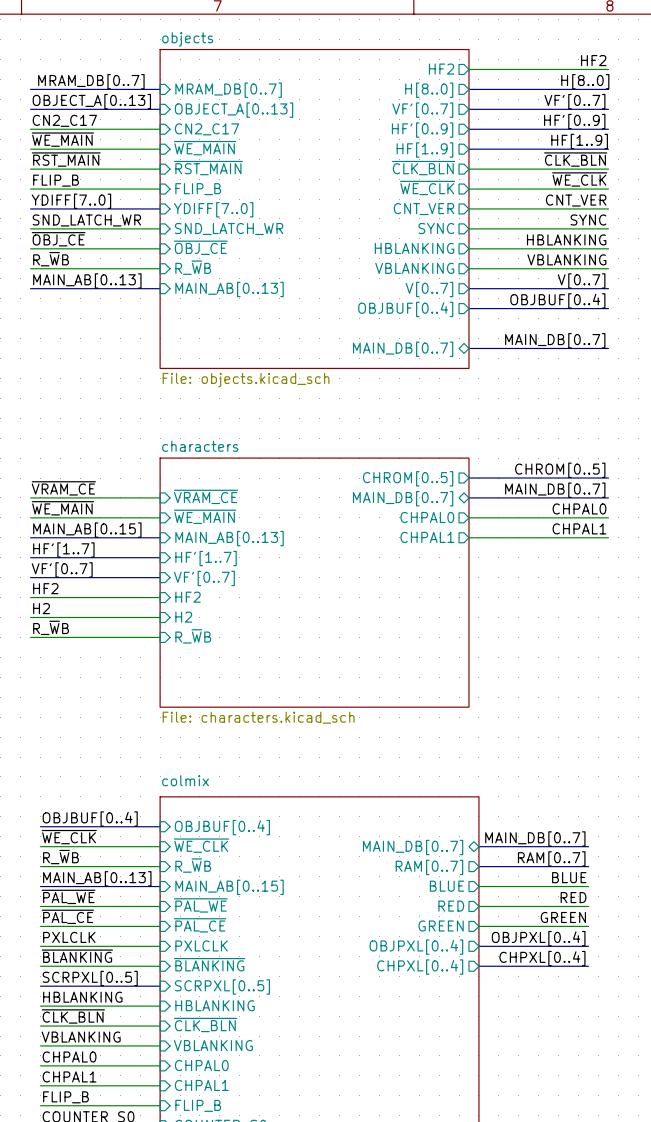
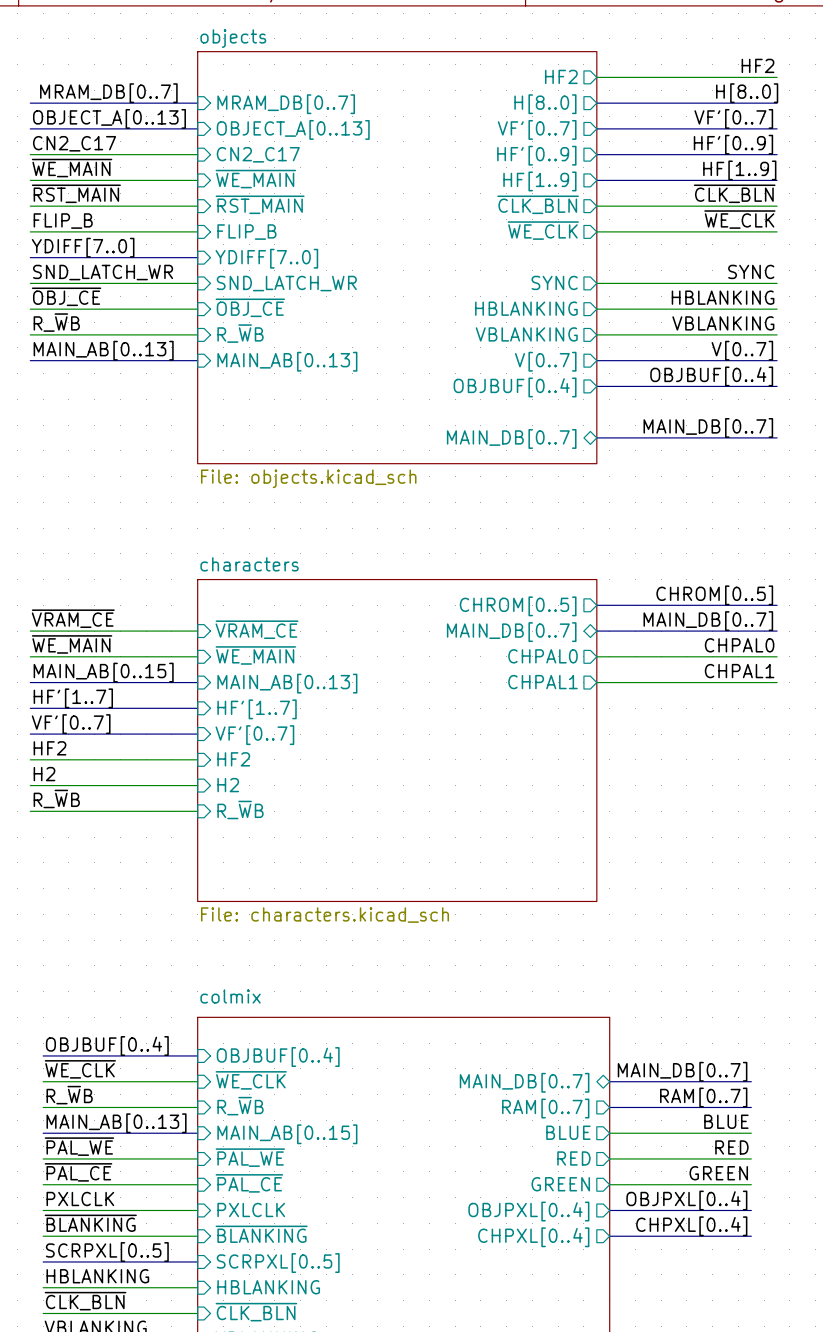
label: CNT_VER (576, 200) -> none
wire: (468, 208) (608, 208) -> none
sheet pin: CNT_VER (424, 209) -> none

